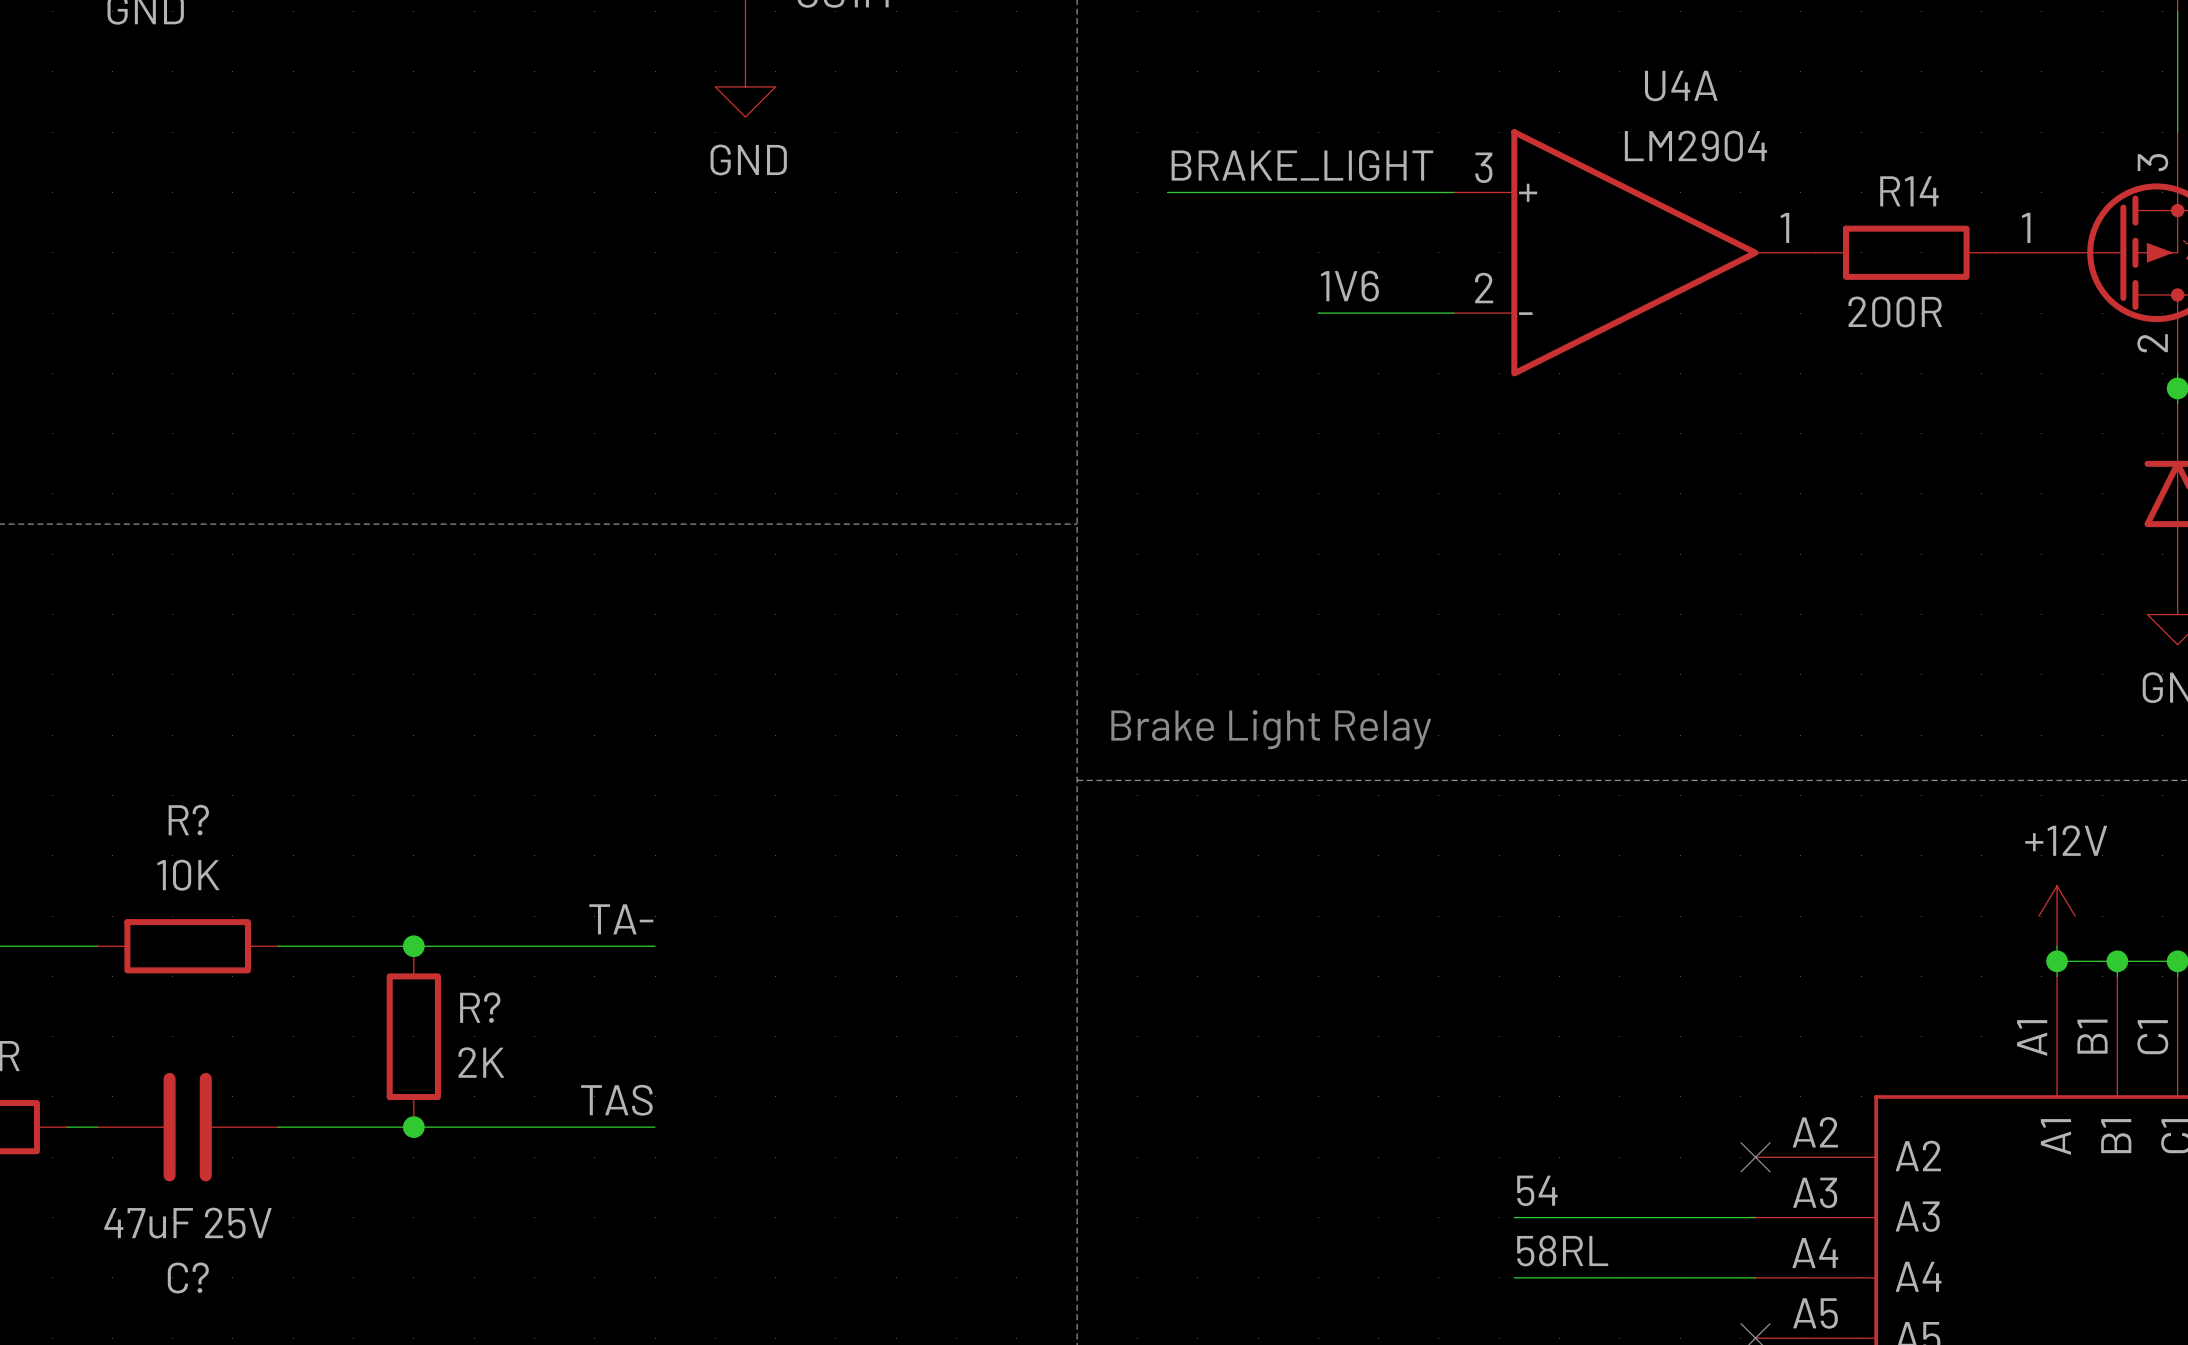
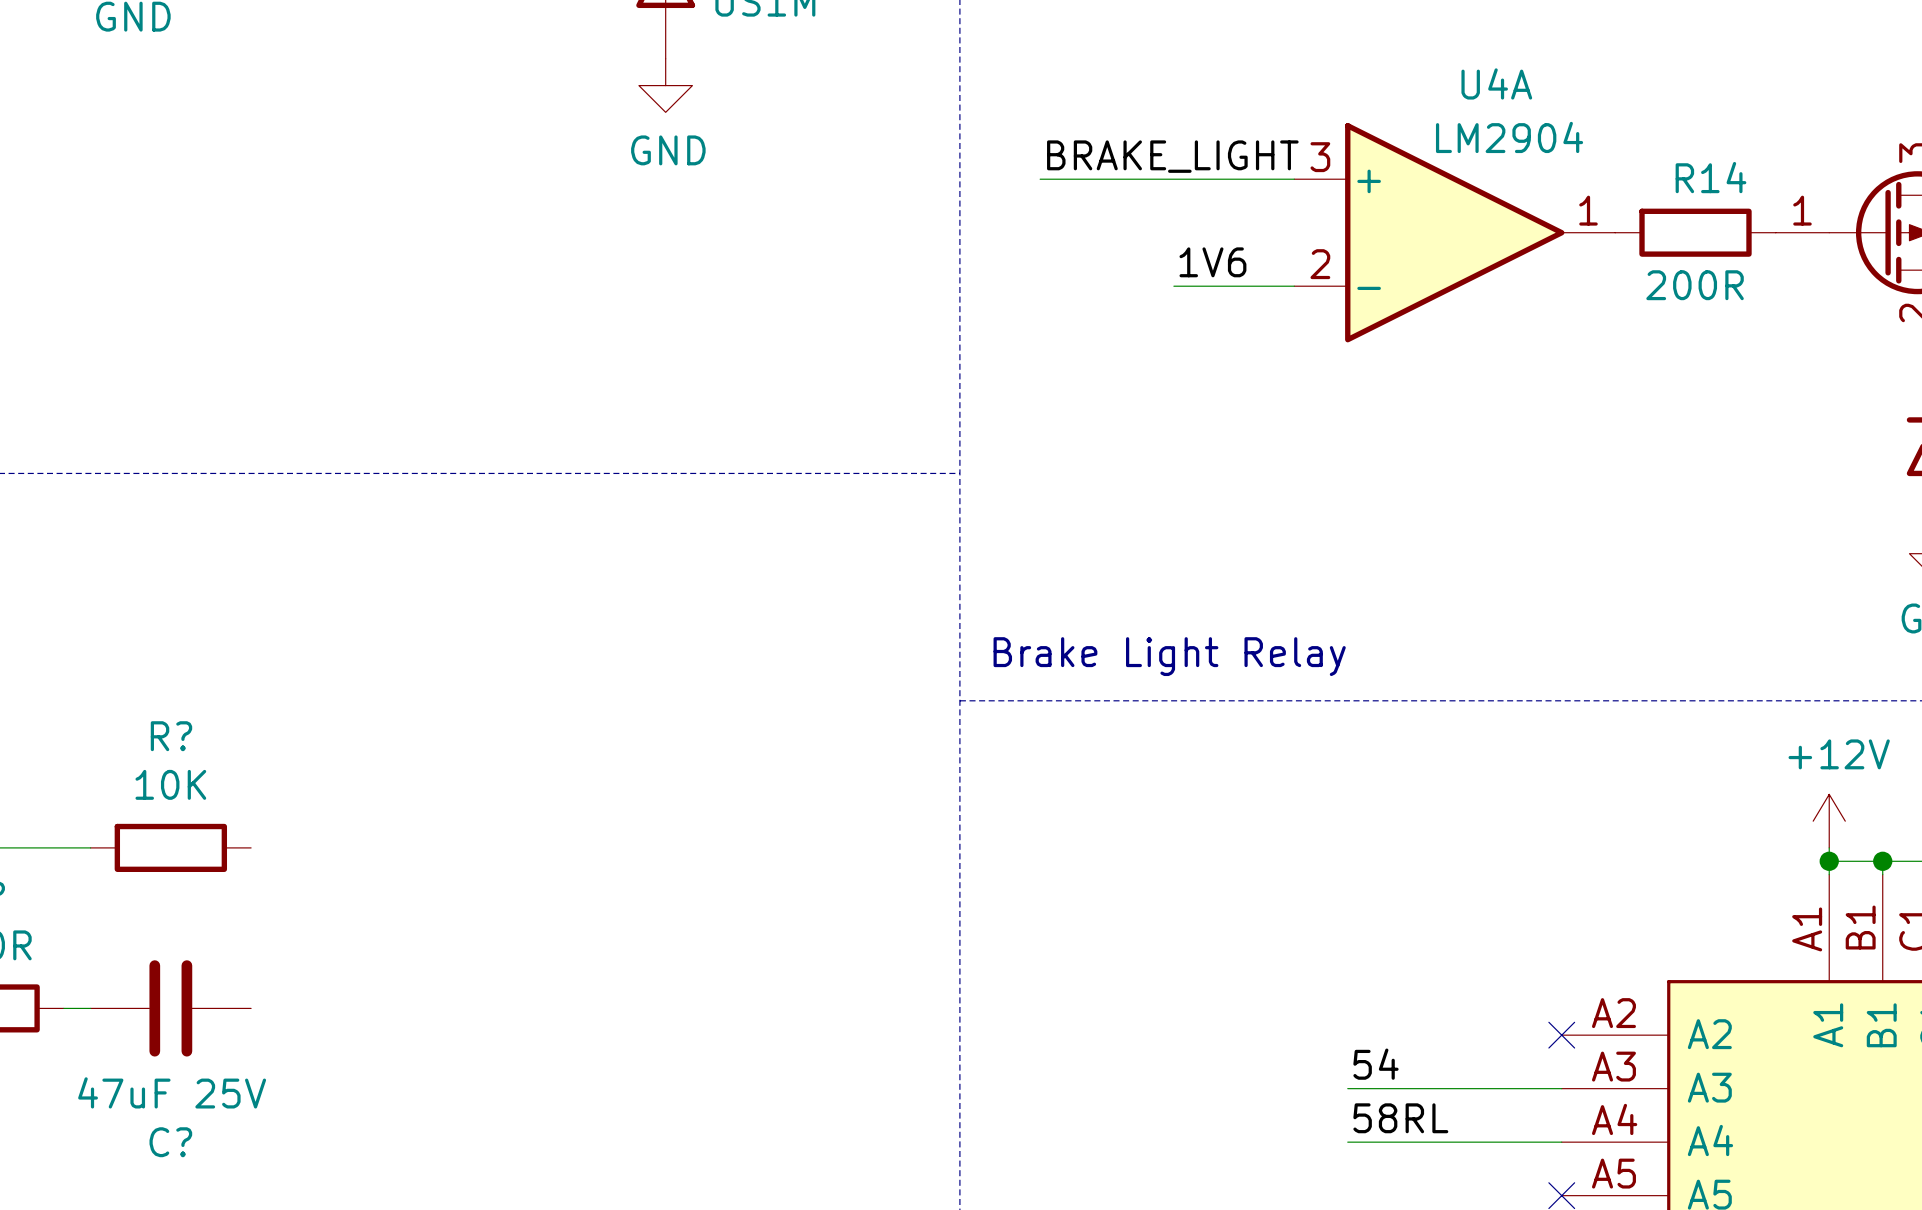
label: TA- (621, 919) -> none
wire: (278, 946) (655, 946) -> none
junction: (413, 946) -> none
R?: 2K (413, 1036) -> none
label: TAS (616, 1100) -> none
wire: (278, 1127) (655, 1127) -> none
junction: (413, 1127) -> none

